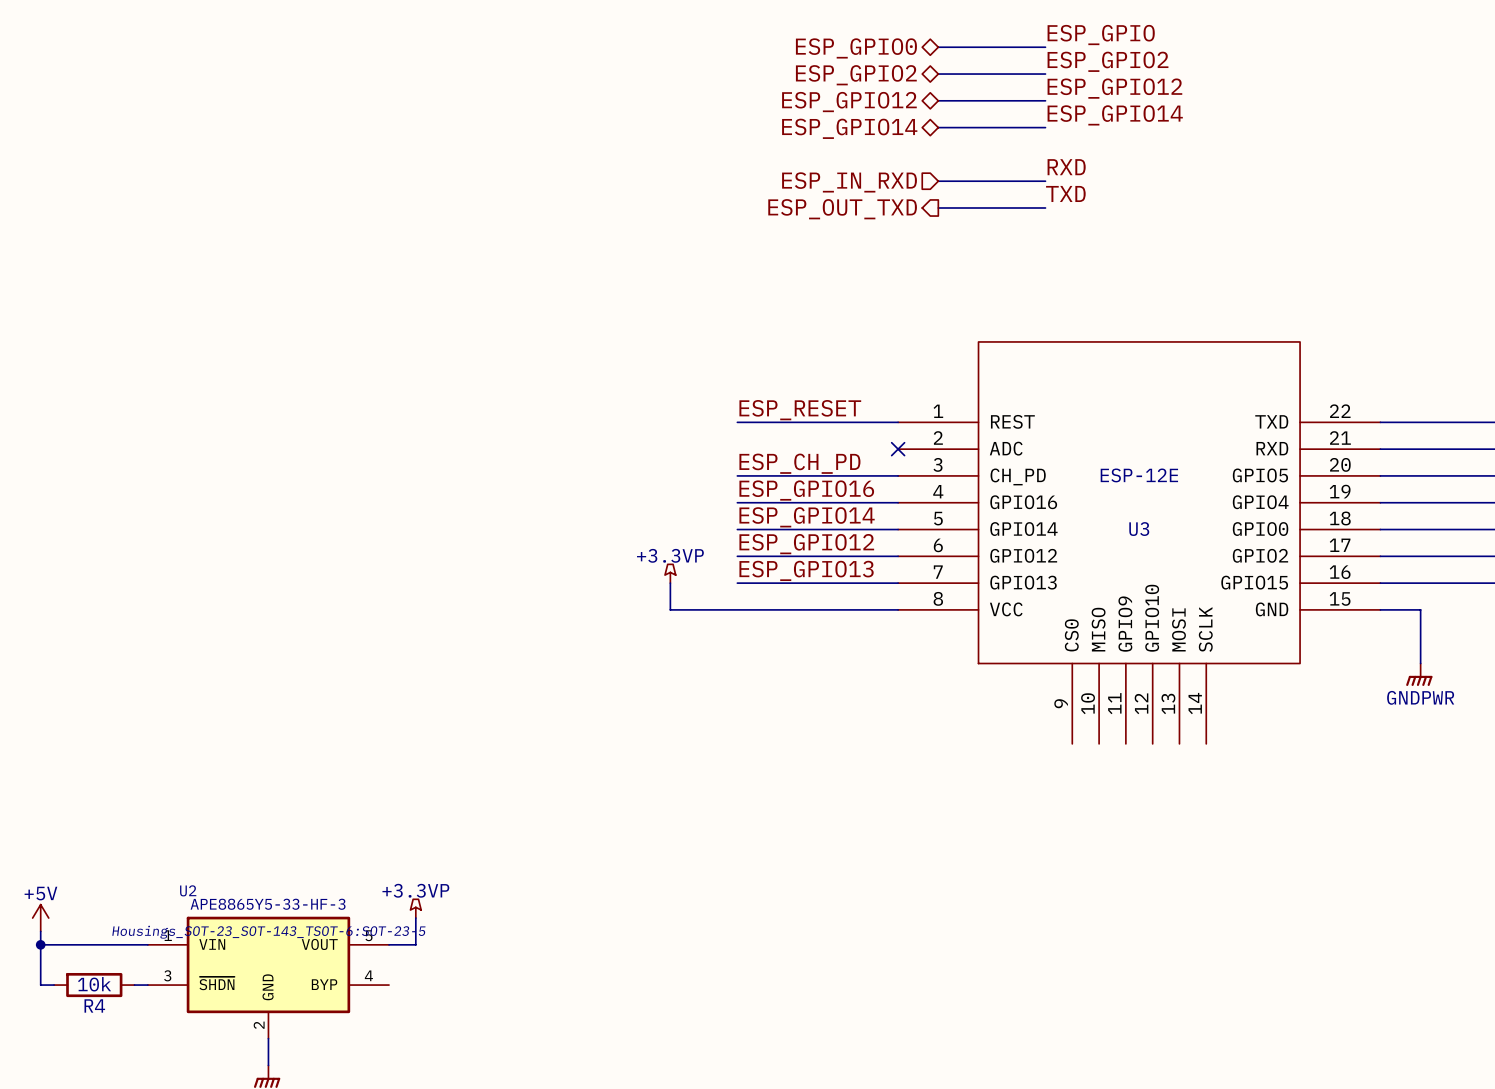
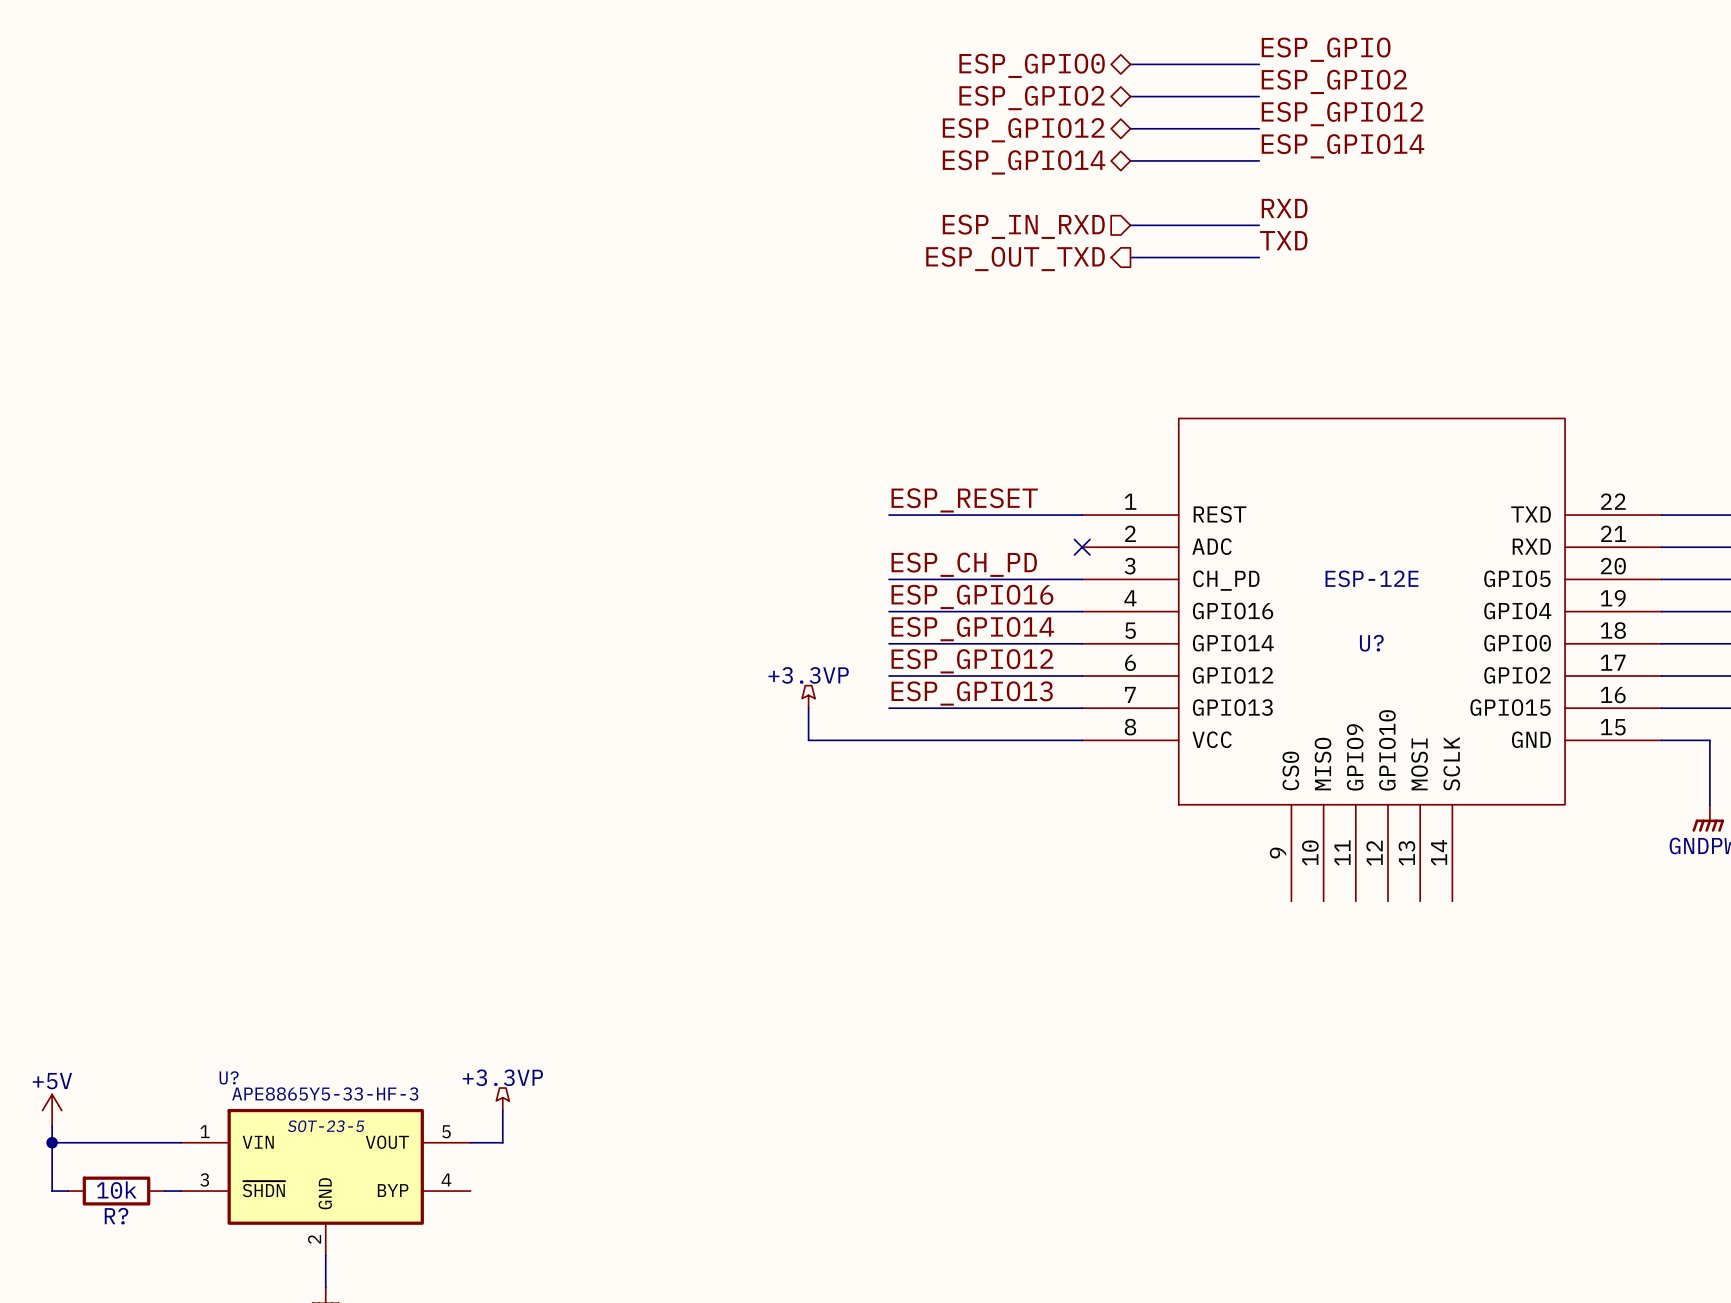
U3 name: U3 (1139, 529) -> U? (1371, 643)
U2 name: U2 (188, 890) -> U? (229, 1077)
U2 text: Housings_SOT-23_SOT-143_TSOT-6:SOT-23-5 (268, 932) -> SOT-23-5 (326, 1126)
R4 name: R4 (94, 1005) -> R? (116, 1216)

